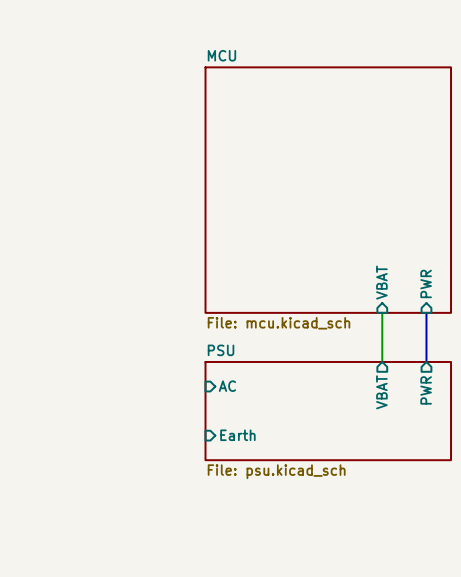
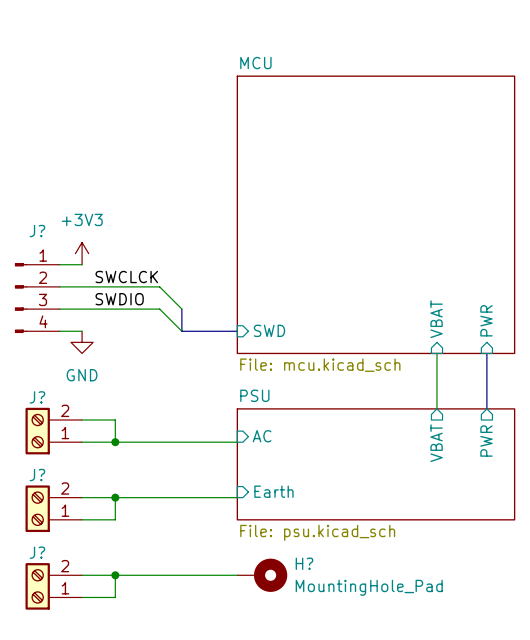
power symbol: none -> +3V3 (82, 253)
wire: none -> (59, 264) (82, 264)
label: none -> SWCLCK (126, 277)
wire: none -> (59, 286) (159, 286) (181, 309)
J?: none -> (37, 298)
label: none -> SWDIO (119, 299)
wire: none -> (59, 309) (159, 309) (181, 331)
bus: none -> (181, 309) (181, 331) (237, 331)
sheet pin: none -> SWD (269, 330)
wire: none -> (59, 331) (82, 331)
power symbol: none -> GND (82, 342)
wire: none -> (82, 420) (115, 420) (115, 442)
J?: none -> (53, 431)
wire: none -> (82, 442) (237, 442)
junction: none -> (115, 442)
wire: none -> (82, 497) (237, 497)
wire: none -> (115, 497) (115, 519) (82, 519)
junction: none -> (115, 497)
J?: none -> (53, 508)
wire: none -> (82, 575) (237, 575)
wire: none -> (115, 575) (115, 597) (82, 597)
junction: none -> (115, 575)
H?: none -> MountingHole_Pad (262, 575)
J?: none -> (53, 586)

